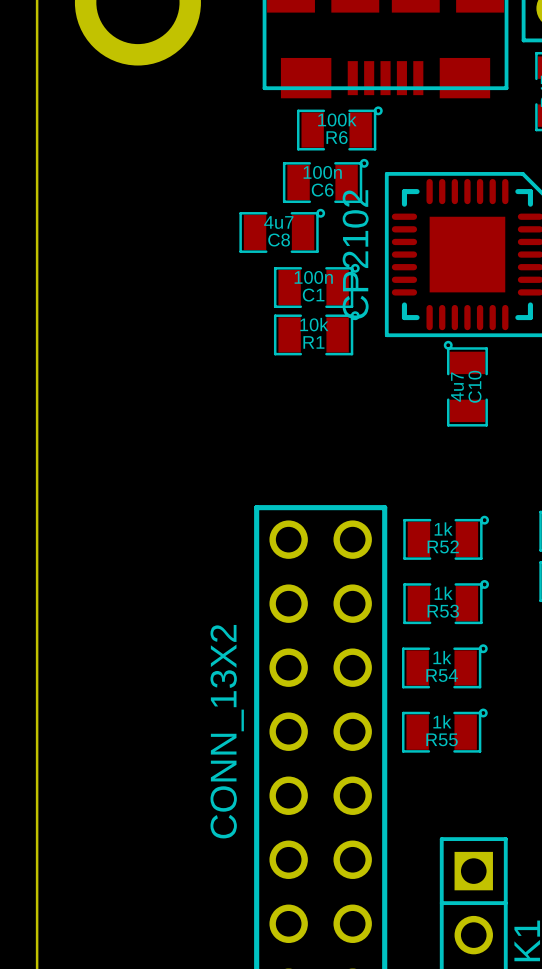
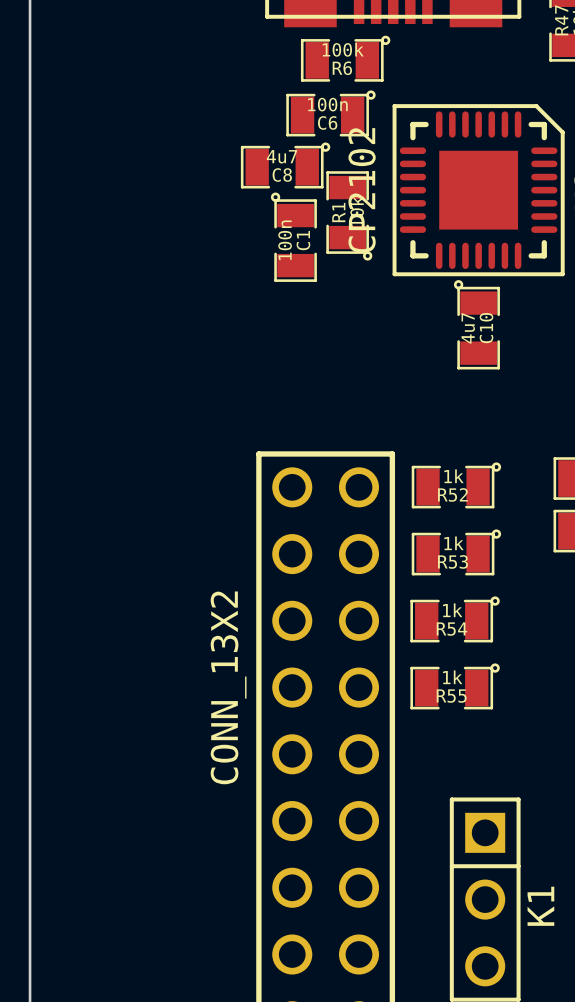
C1 rotation: 0° (316, 285) -> 90° counterclockwise (293, 237)
R1 rotation: 0° (316, 333) -> 90° clockwise (349, 215)
R1 position: (316, 333) -> (349, 215)

